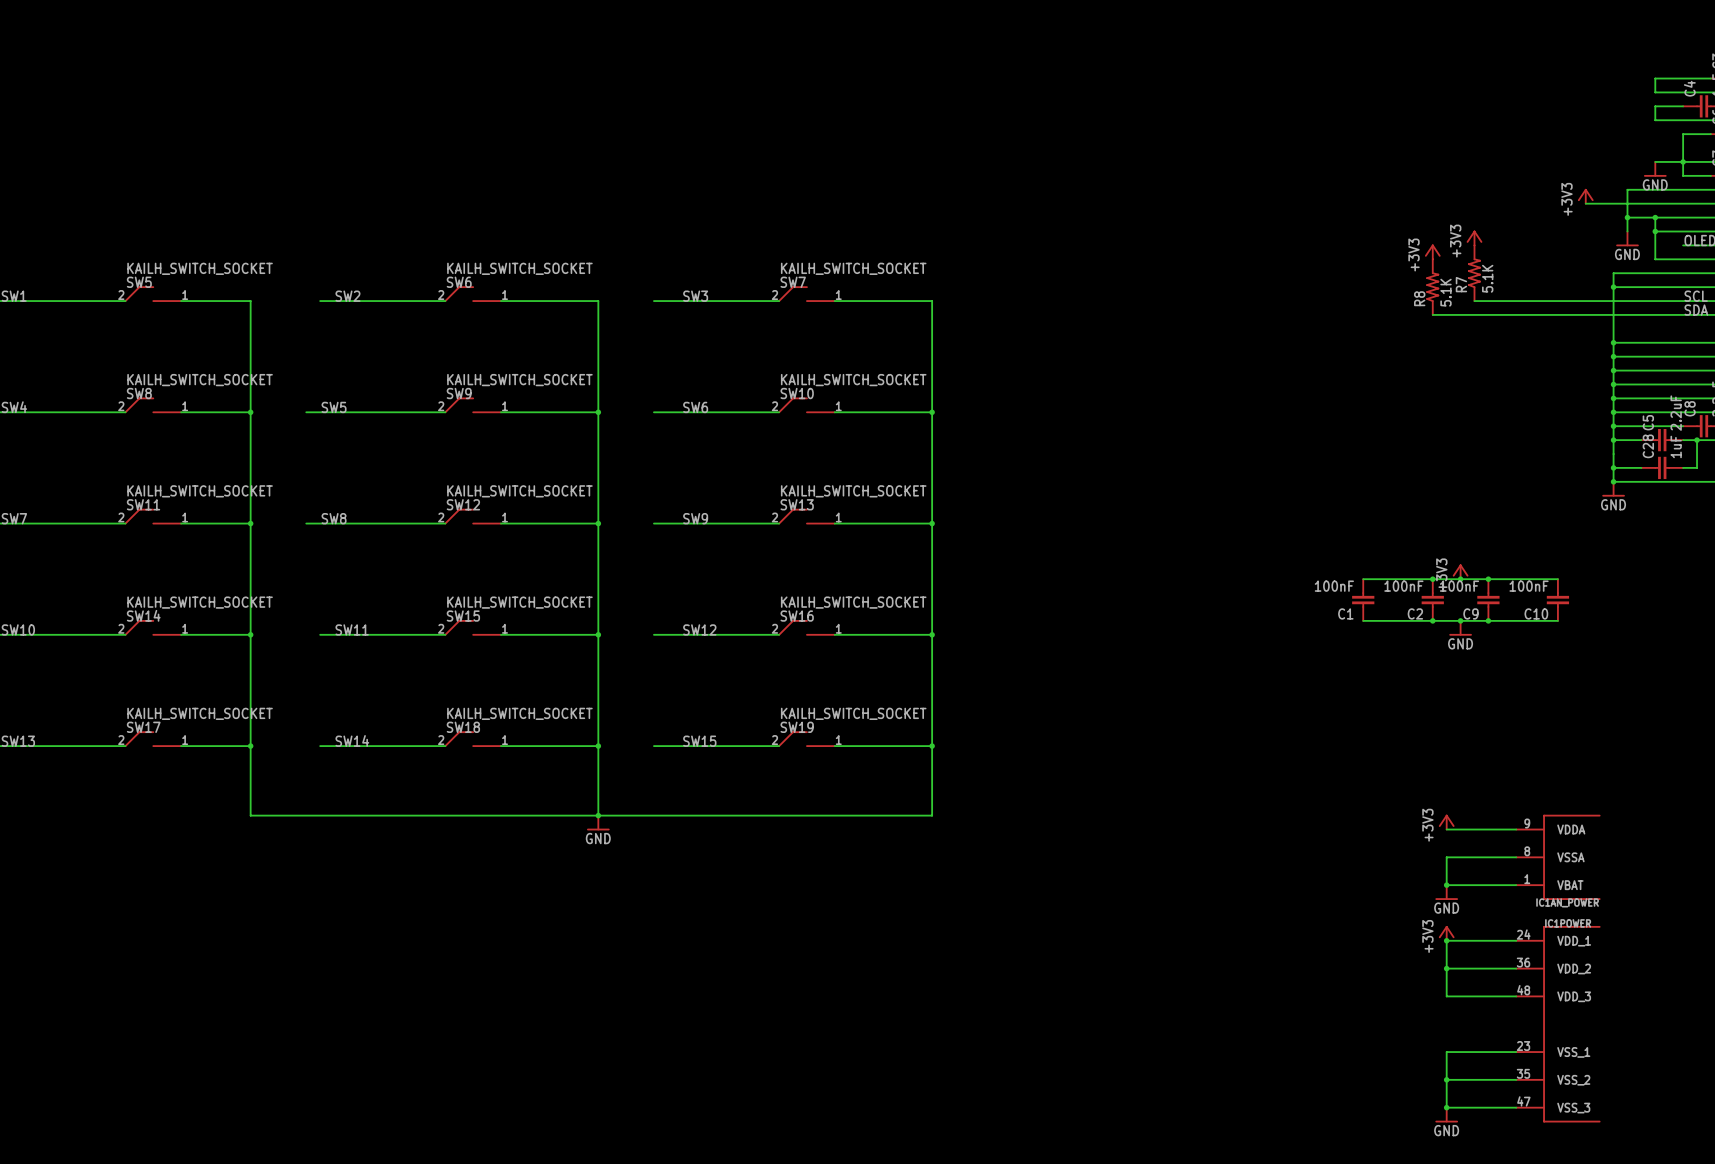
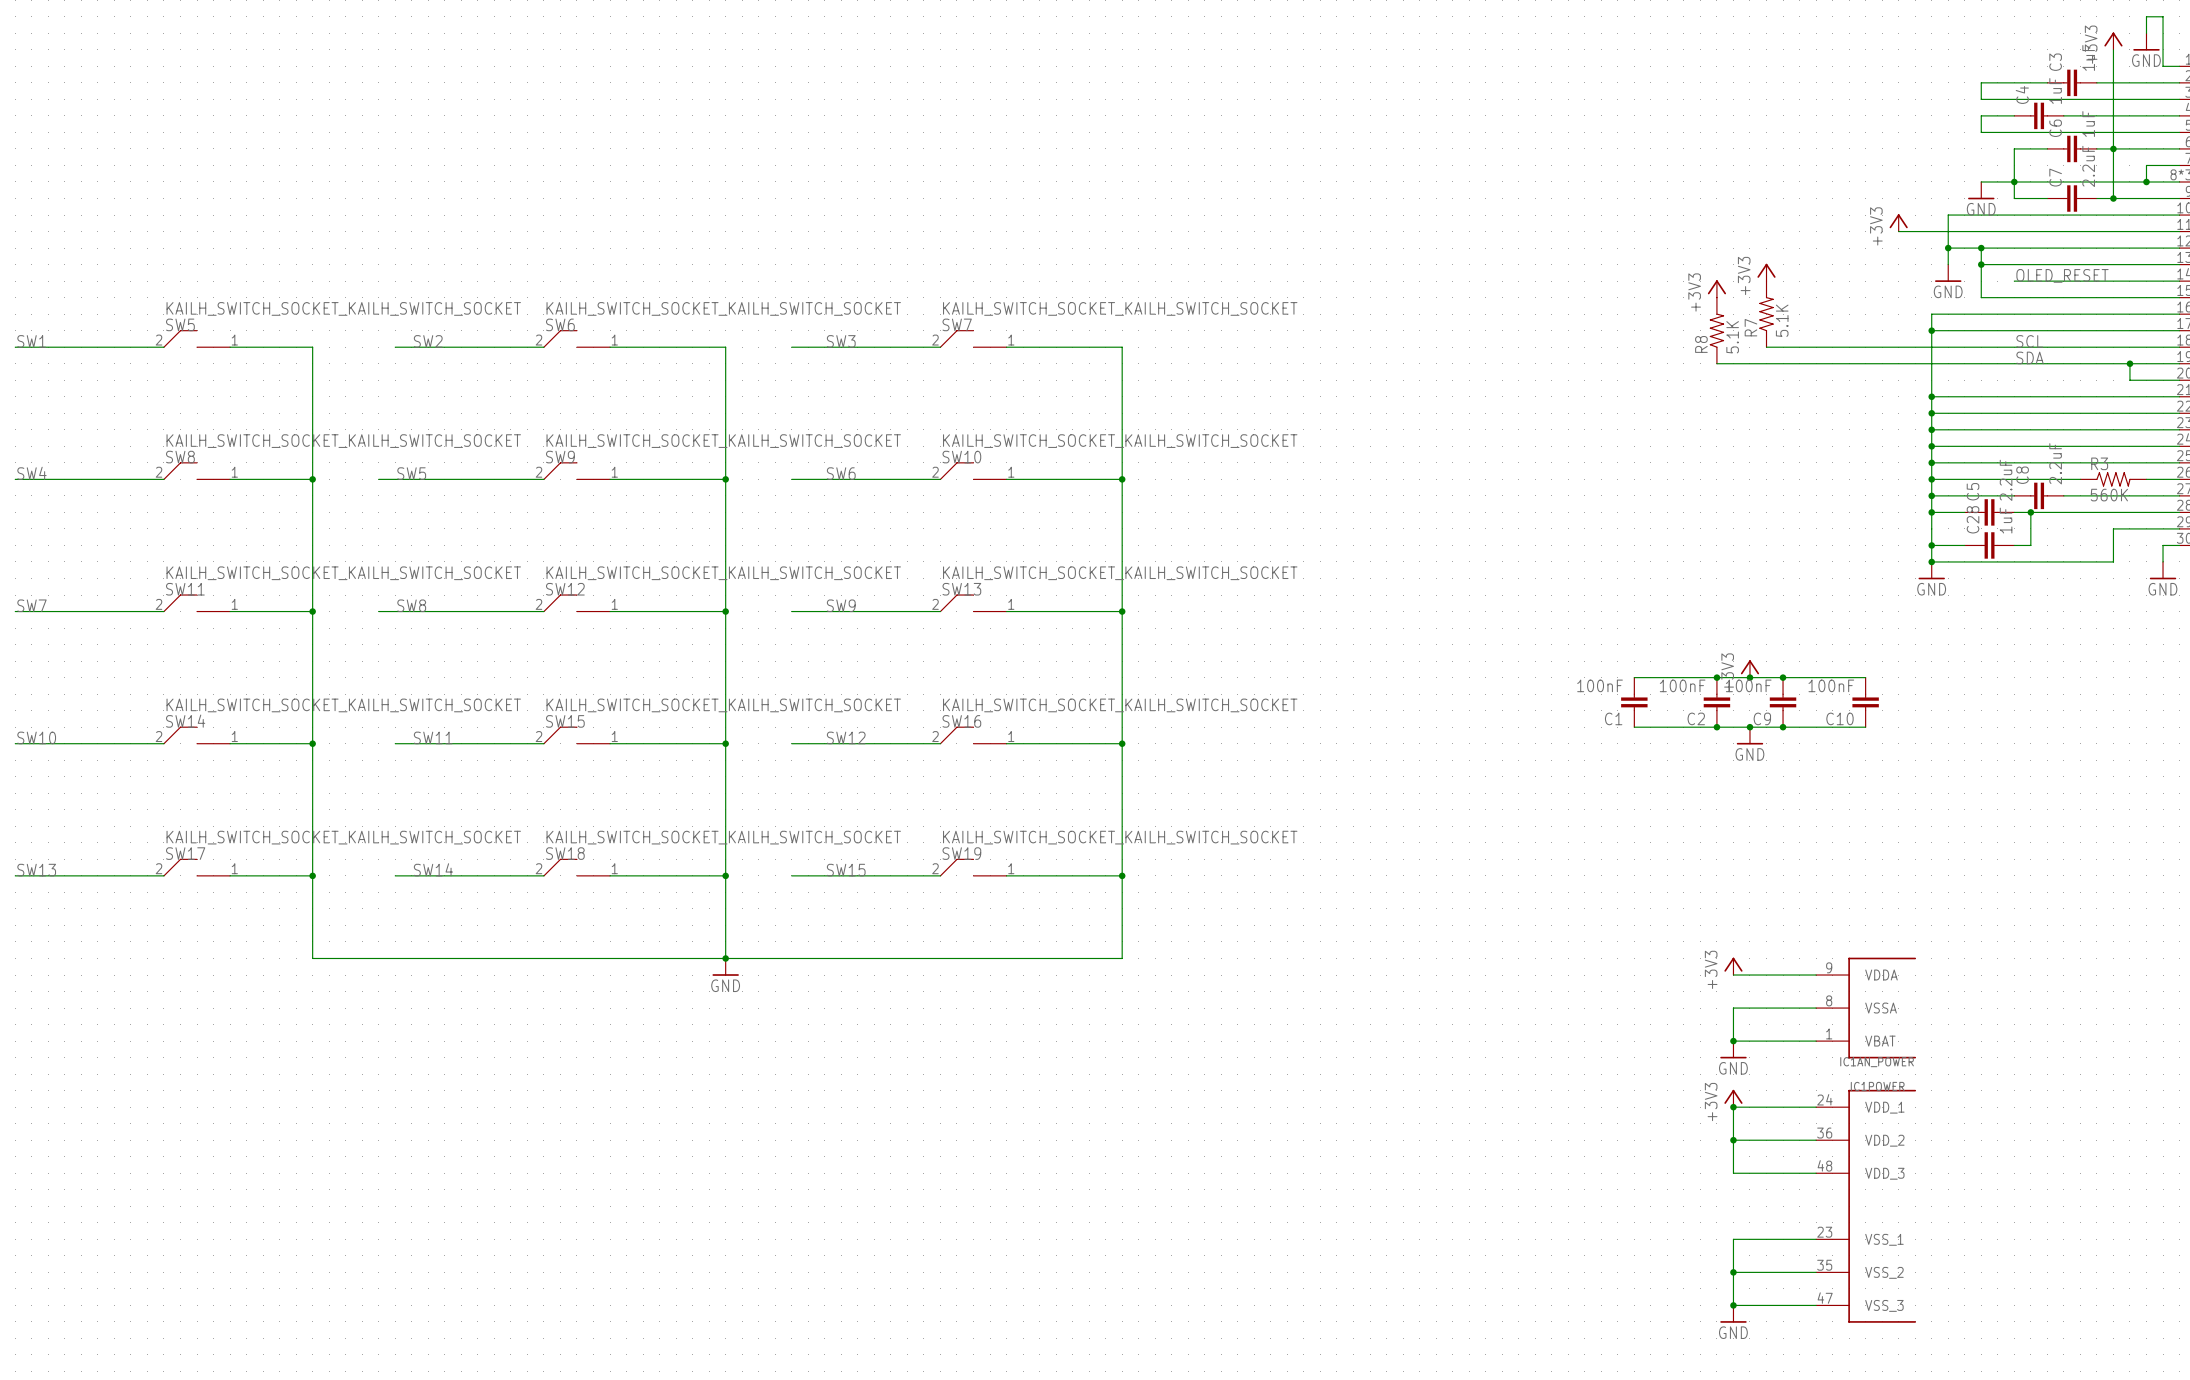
SW5 value: KAILH_SWITCH_SOCKET (200, 268) -> KAILH_SWITCH_SOCKET_KAILH_SWITCH_SOCKET (343, 308)
SW6 value: KAILH_SWITCH_SOCKET (519, 268) -> KAILH_SWITCH_SOCKET_KAILH_SWITCH_SOCKET (723, 308)
SW7 value: KAILH_SWITCH_SOCKET (853, 268) -> KAILH_SWITCH_SOCKET_KAILH_SWITCH_SOCKET (1120, 308)
SW8 value: KAILH_SWITCH_SOCKET (200, 380) -> KAILH_SWITCH_SOCKET_KAILH_SWITCH_SOCKET (343, 441)
SW9 value: KAILH_SWITCH_SOCKET (519, 380) -> KAILH_SWITCH_SOCKET_KAILH_SWITCH_SOCKET (723, 441)
SW10 value: KAILH_SWITCH_SOCKET (853, 380) -> KAILH_SWITCH_SOCKET_KAILH_SWITCH_SOCKET (1120, 441)
SW11 value: KAILH_SWITCH_SOCKET (200, 491) -> KAILH_SWITCH_SOCKET_KAILH_SWITCH_SOCKET (343, 573)
SW12 value: KAILH_SWITCH_SOCKET (519, 491) -> KAILH_SWITCH_SOCKET_KAILH_SWITCH_SOCKET (723, 573)
SW13 value: KAILH_SWITCH_SOCKET (853, 491) -> KAILH_SWITCH_SOCKET_KAILH_SWITCH_SOCKET (1120, 573)
SW14 value: KAILH_SWITCH_SOCKET (200, 602) -> KAILH_SWITCH_SOCKET_KAILH_SWITCH_SOCKET (343, 705)
SW15 value: KAILH_SWITCH_SOCKET (519, 602) -> KAILH_SWITCH_SOCKET_KAILH_SWITCH_SOCKET (723, 705)
SW16 value: KAILH_SWITCH_SOCKET (853, 602) -> KAILH_SWITCH_SOCKET_KAILH_SWITCH_SOCKET (1120, 705)
SW17 value: KAILH_SWITCH_SOCKET (200, 713) -> KAILH_SWITCH_SOCKET_KAILH_SWITCH_SOCKET (343, 837)
SW18 value: KAILH_SWITCH_SOCKET (519, 713) -> KAILH_SWITCH_SOCKET_KAILH_SWITCH_SOCKET (723, 837)
SW19 value: KAILH_SWITCH_SOCKET (853, 713) -> KAILH_SWITCH_SOCKET_KAILH_SWITCH_SOCKET (1120, 837)

